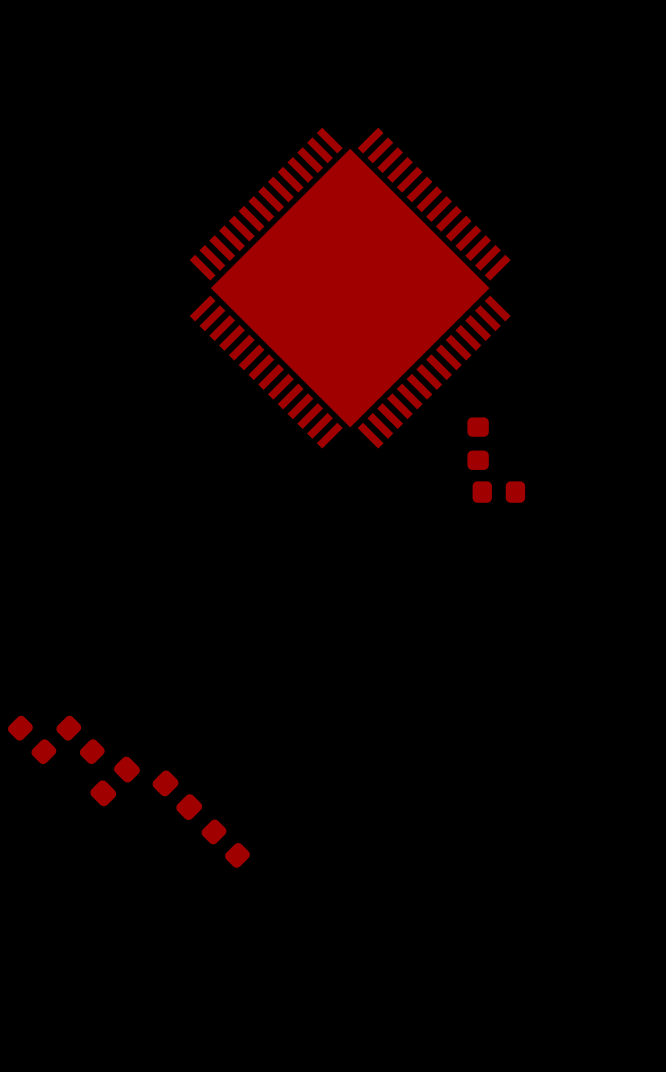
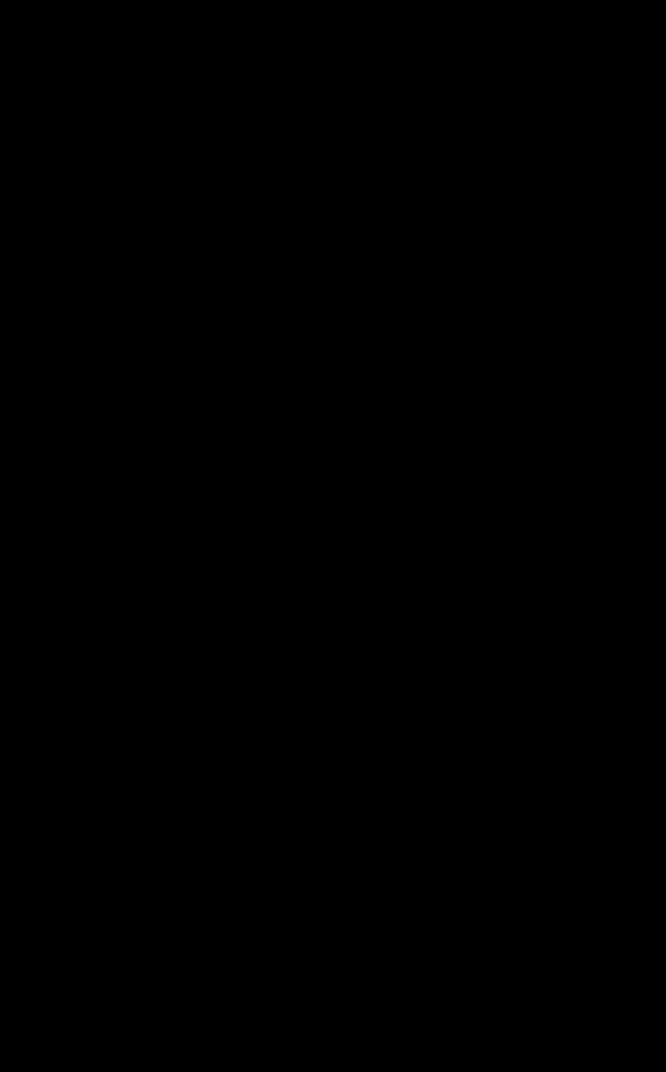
part: (350, 288) -> none
part: (478, 443) -> none
part: (498, 492) -> none
part: (32, 739) -> none
part: (80, 739) -> none
part: (115, 781) -> none
part: (177, 795) -> none
part: (225, 843) -> none

